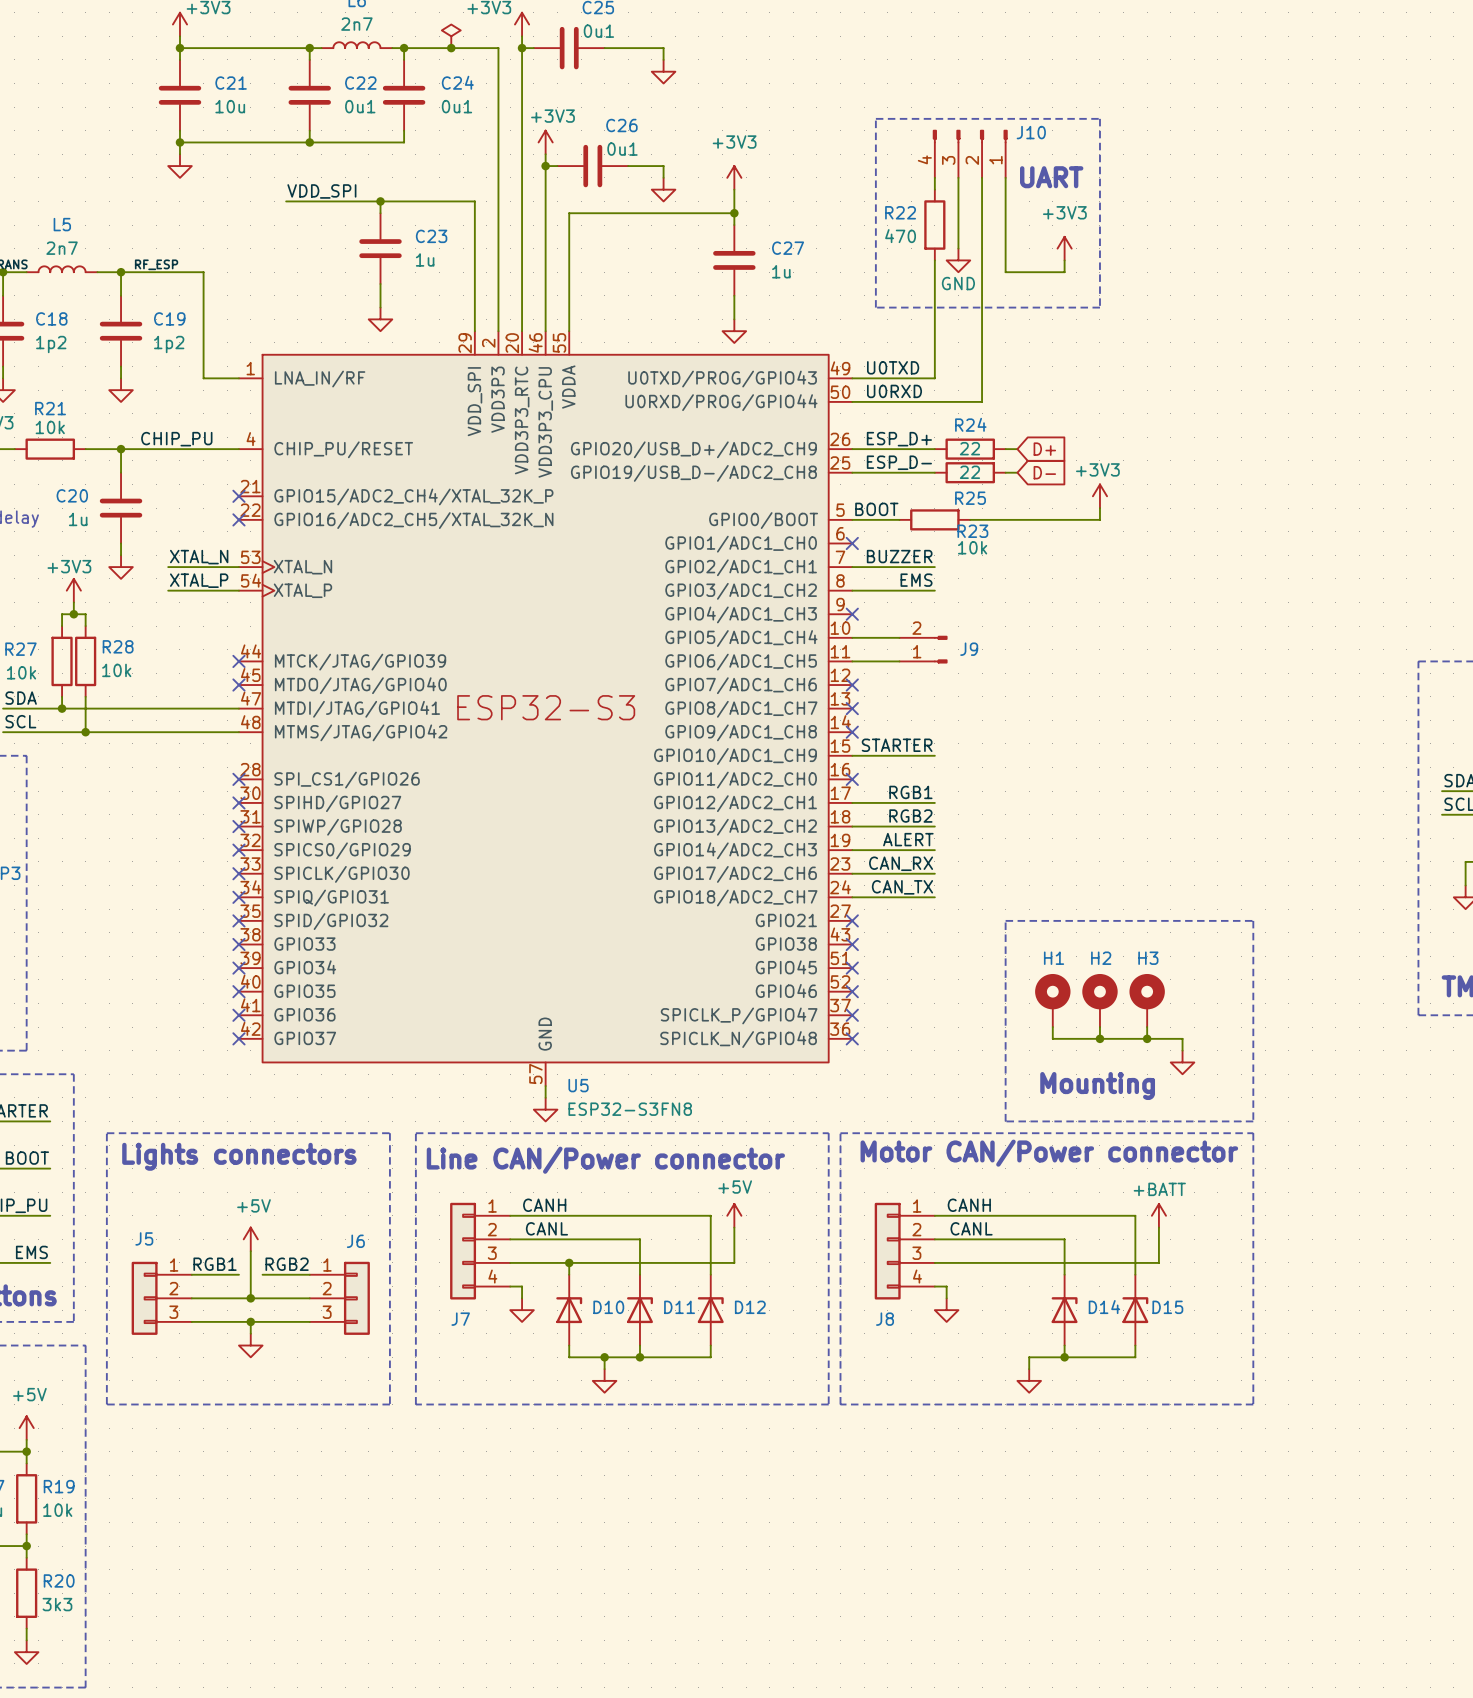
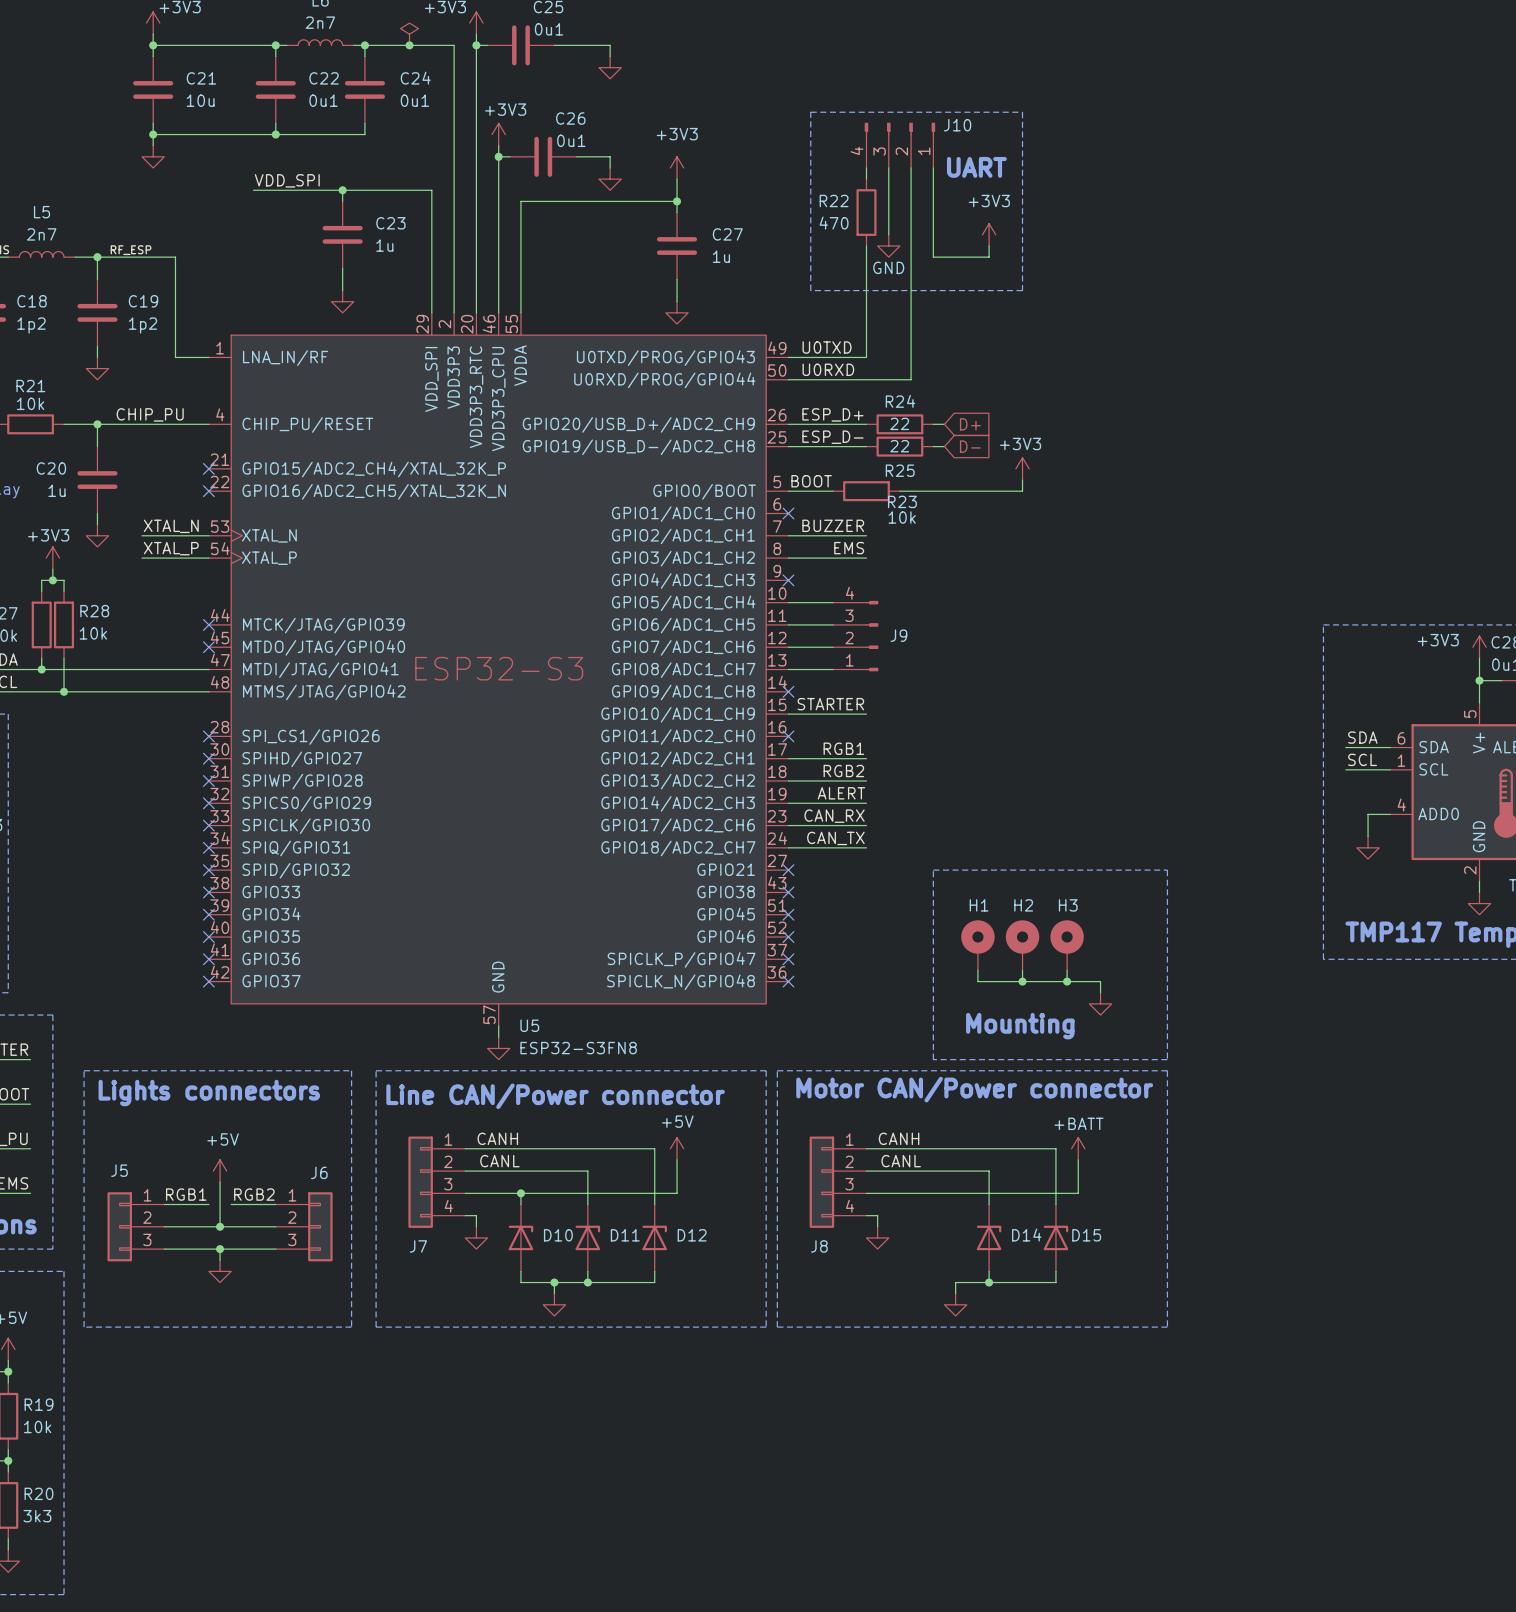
J9 symbol: [899, 635, 948, 664] -> [833, 600, 879, 672]
wire: none -> (788, 647) (833, 647)
no-connect mark: (852, 685) -> none
wire: none -> (788, 669) (833, 669)
no-connect mark: (852, 708) -> none

